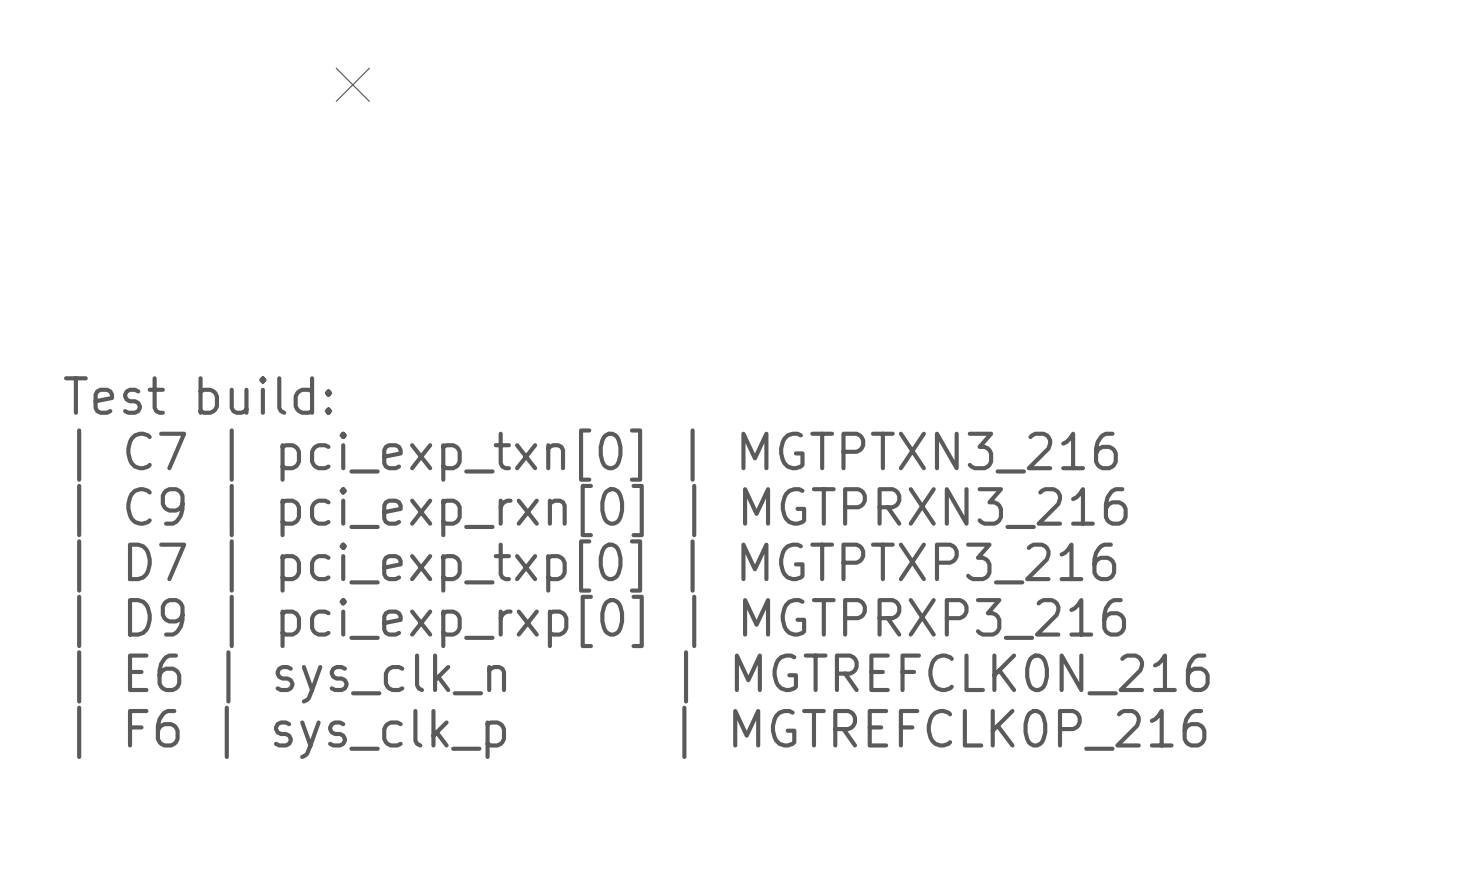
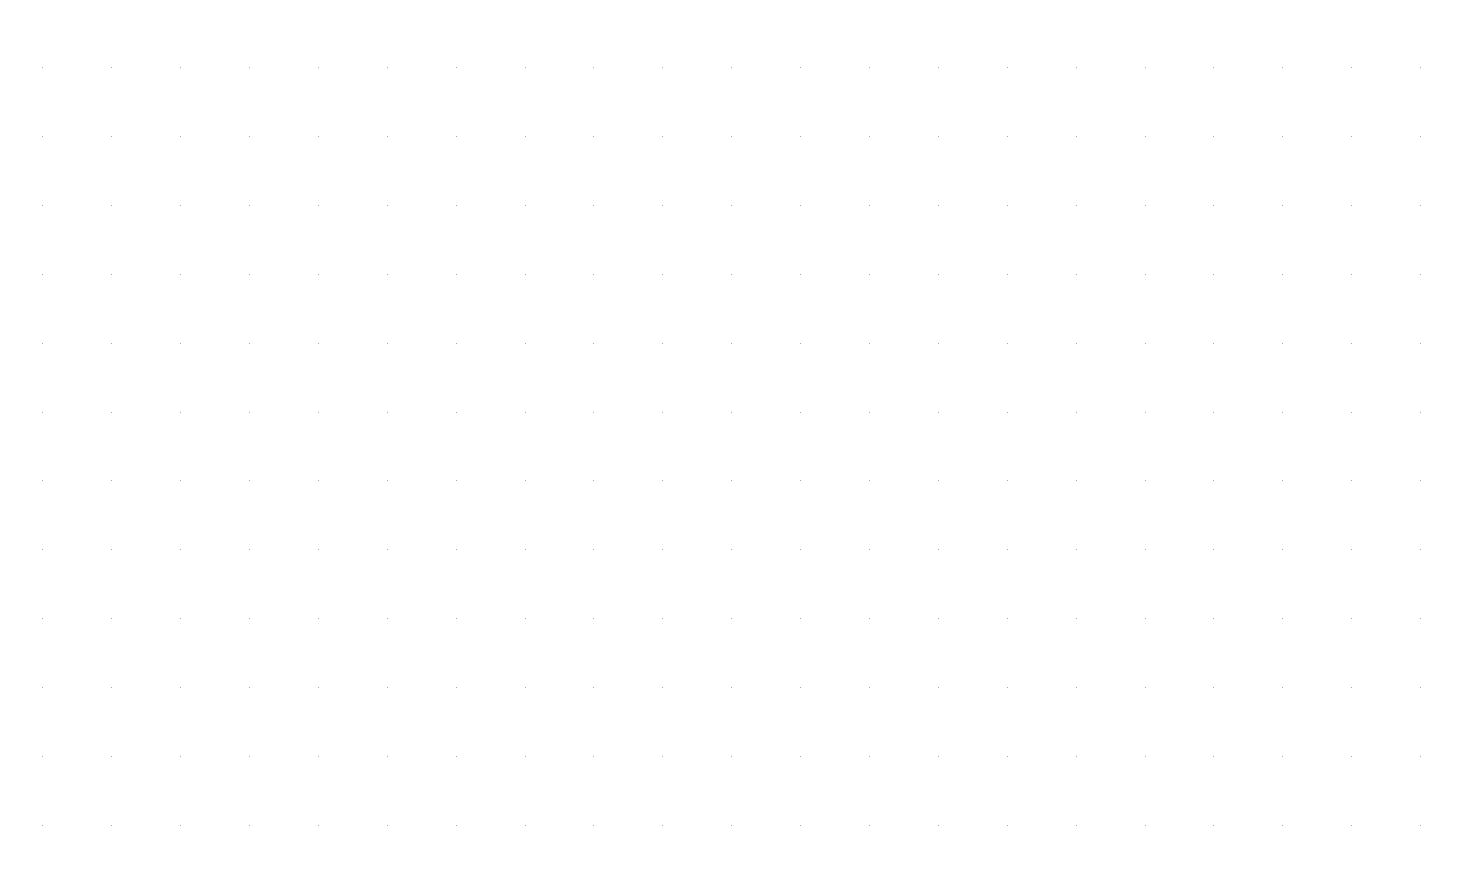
no-connect mark: (352, 84) -> none
text: Test build: (198, 395) -> none
text: | C7 | pci_exp_txn[0] | MGTPTXN3_216 (597, 455) -> none
text: | C9 | pci_exp_rxn[0] | MGTPRXN3_216 (602, 510) -> none
text: | D7 | pci_exp_txp[0] | MGTPTXP3_216 (596, 565) -> none
text: | D9 | pci_exp_rxp[0] | MGTPRXP3_216 (601, 621) -> none
text: | E6 | sys_clk_n | MGTREFCLK0N_216 (643, 676) -> none
text: | F6 | sys_clk_p | MGTREFCLK0P_216 (641, 732) -> none

